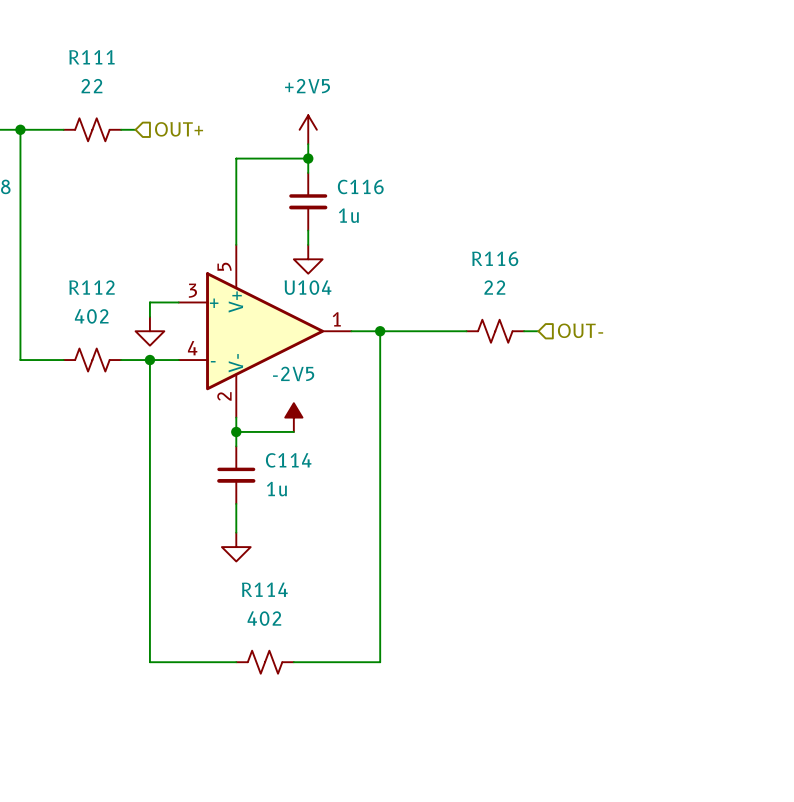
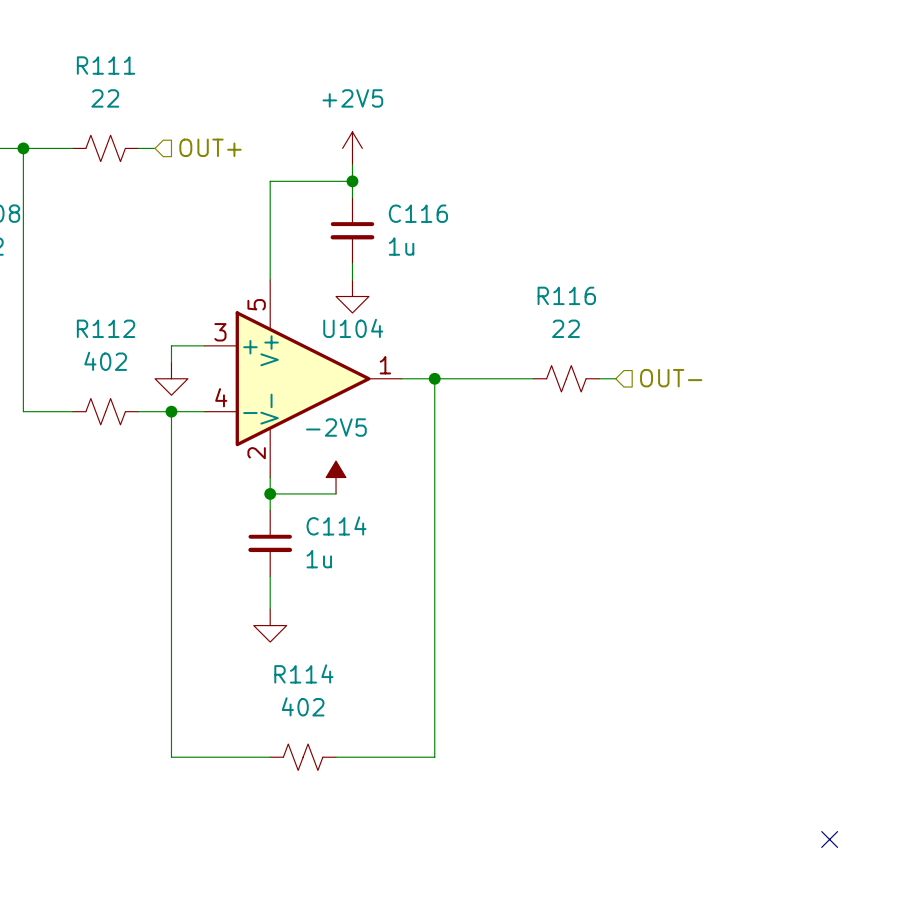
no-connect mark: none -> (829, 839)

